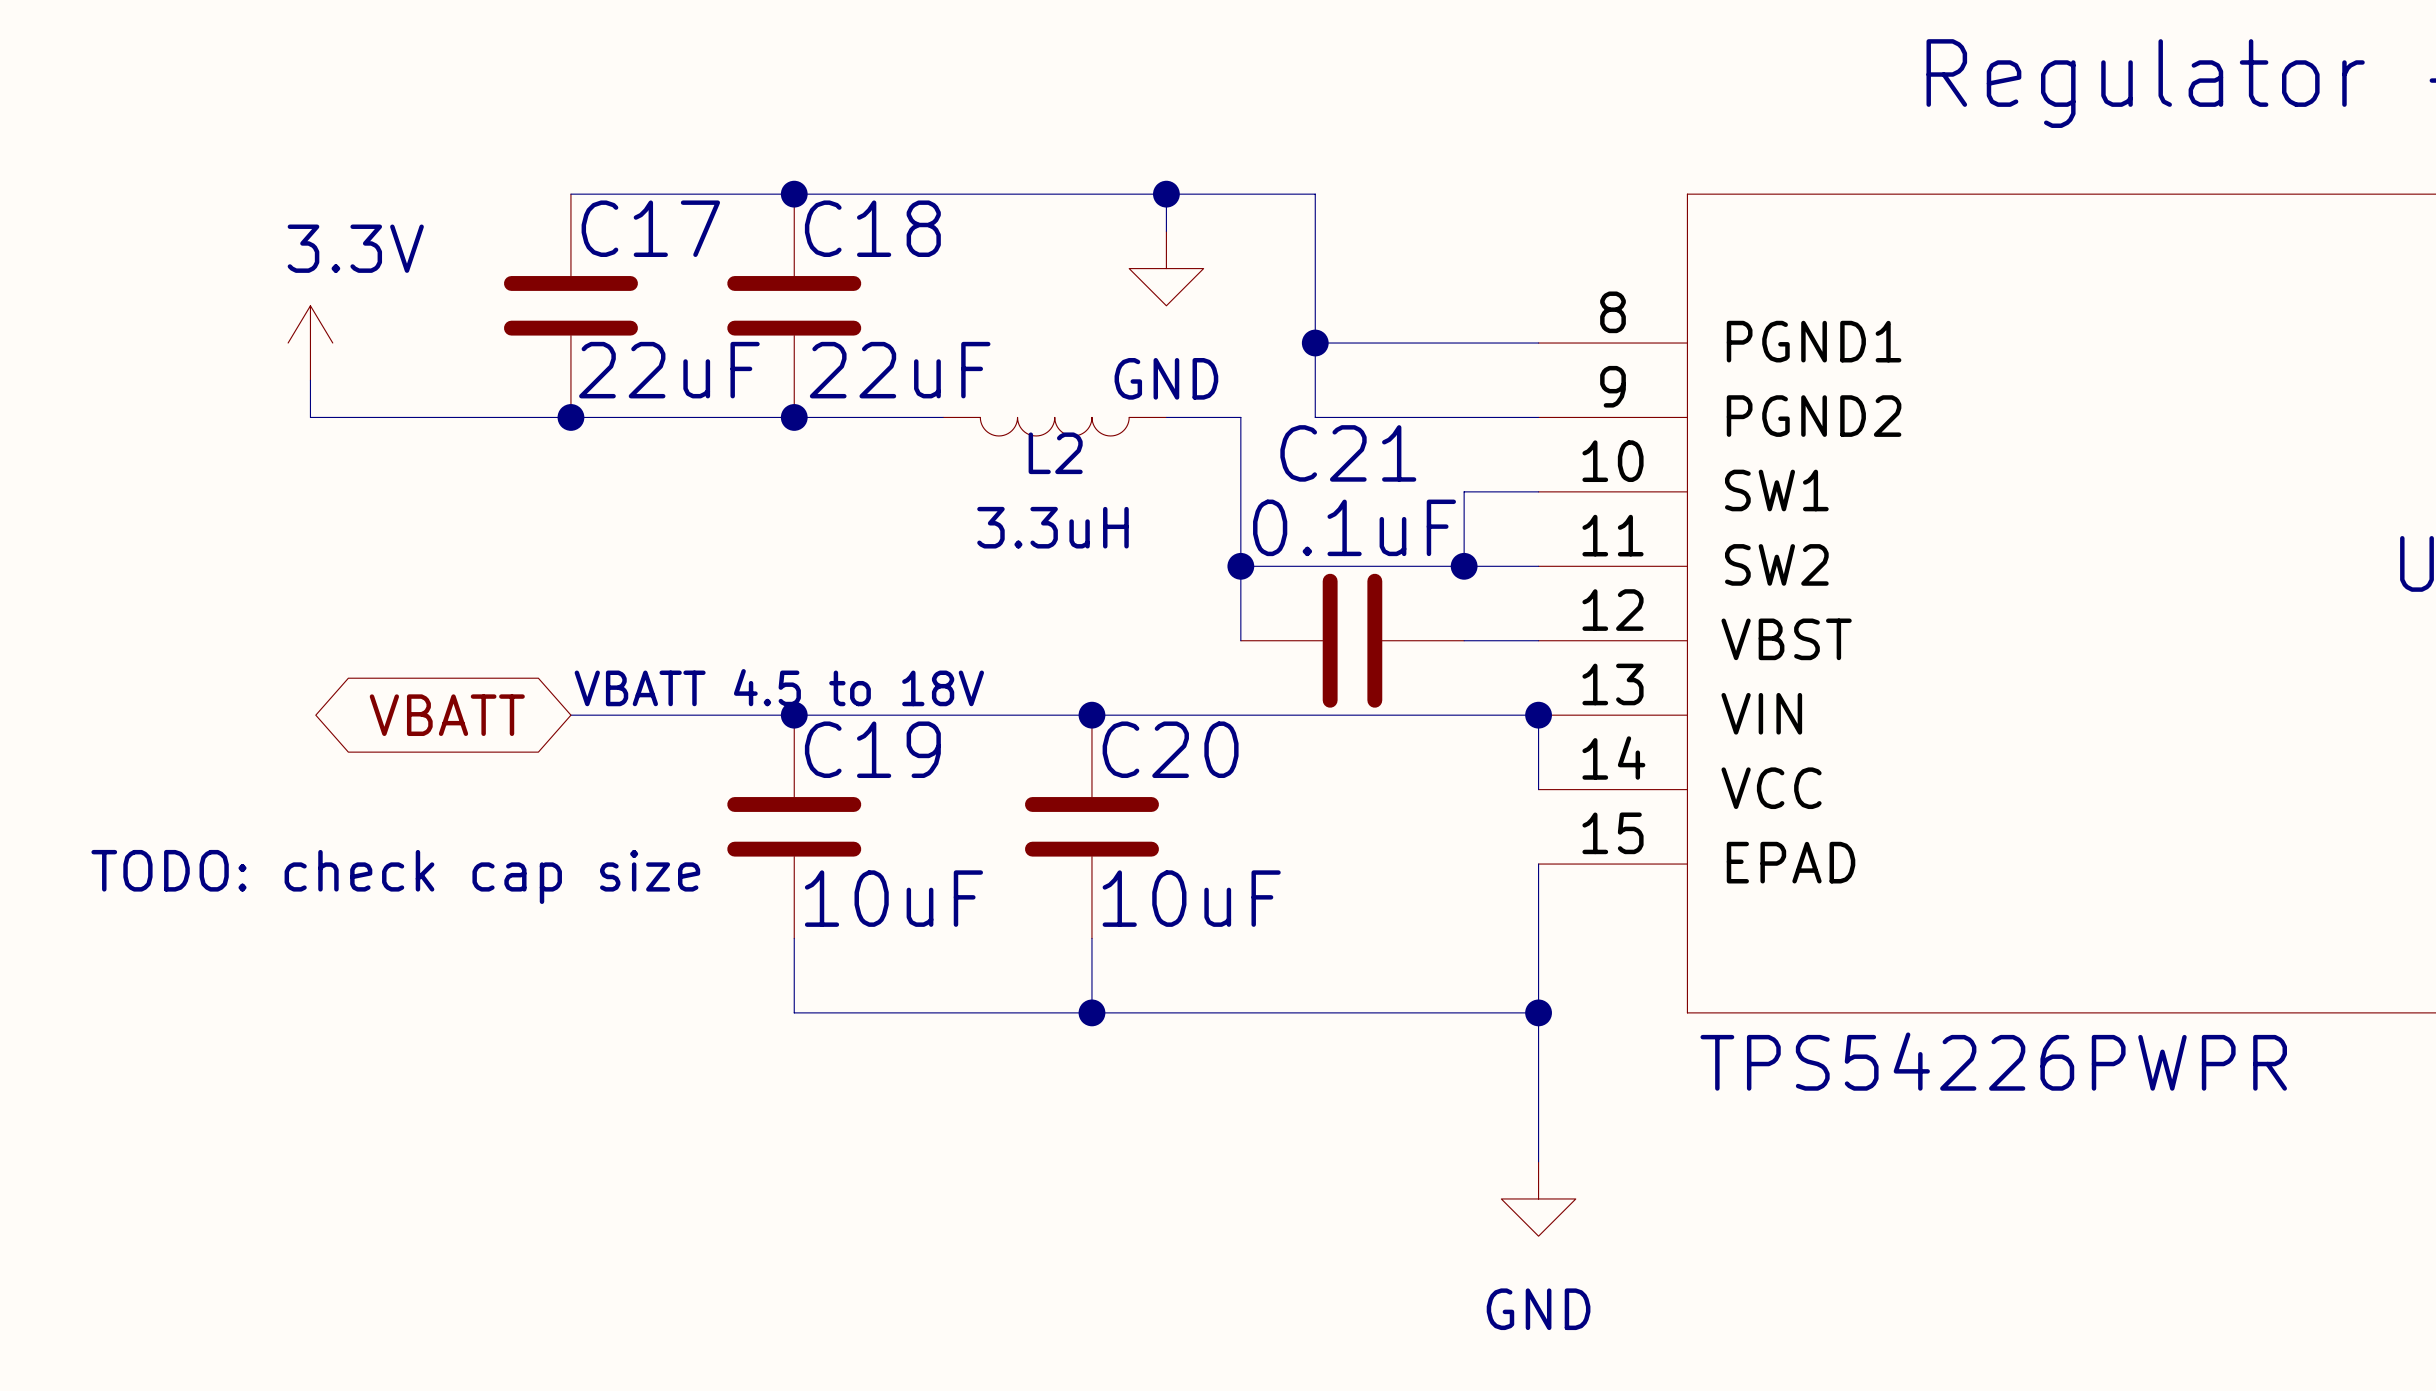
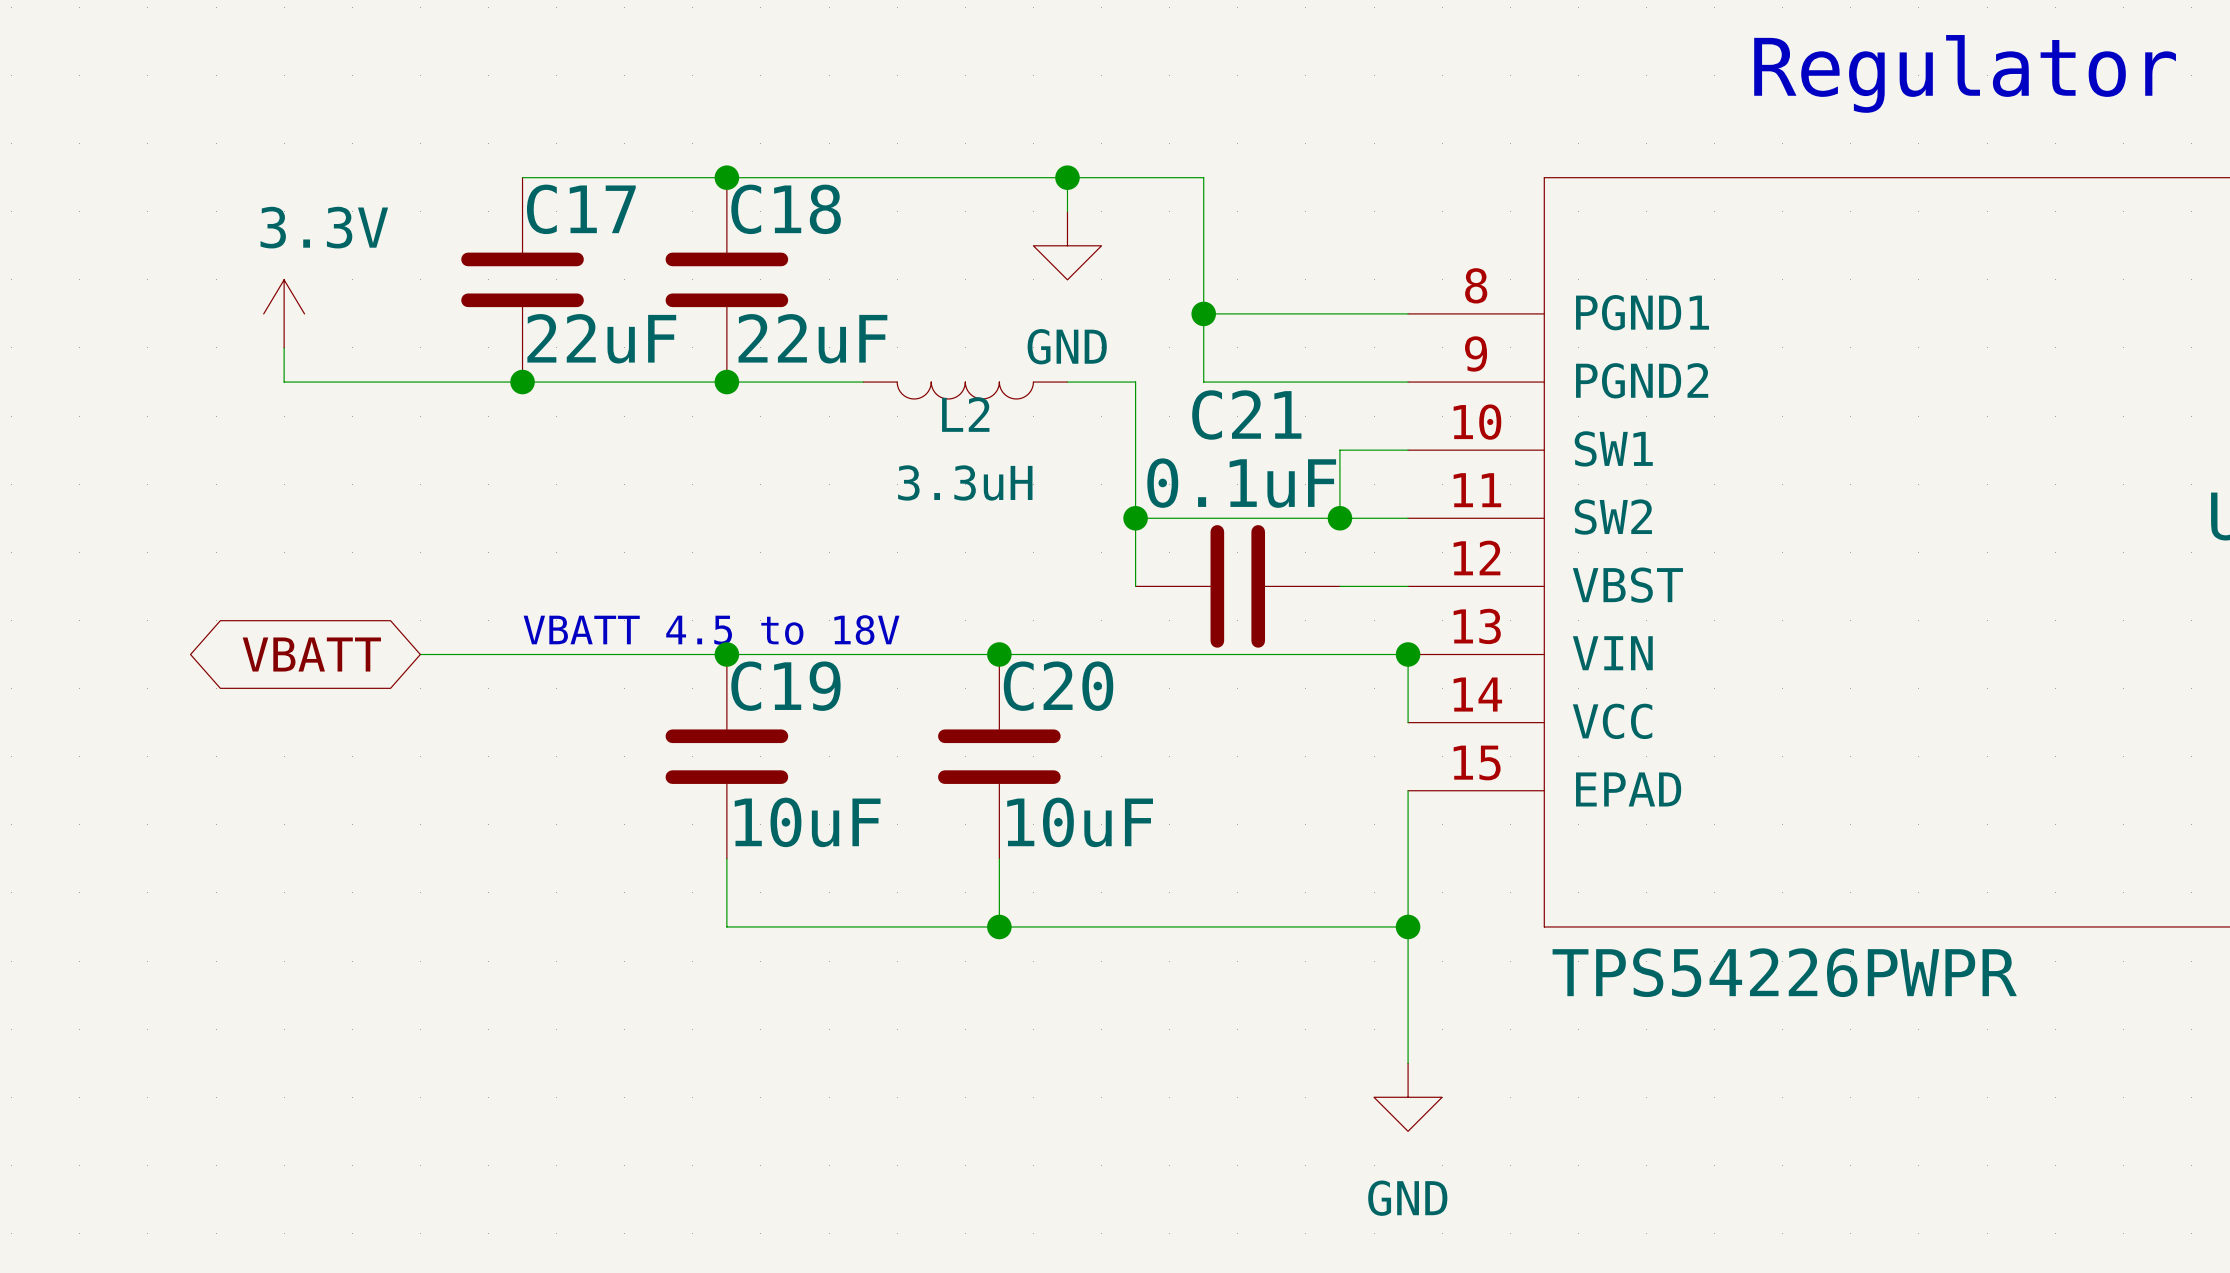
global label position: VBATT (447, 715) -> VBATT (311, 654)
wire: none -> (420, 654) (522, 654)
text: TODO: check cap size (395, 876) -> none

